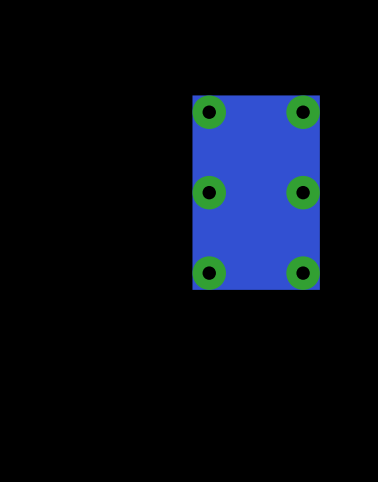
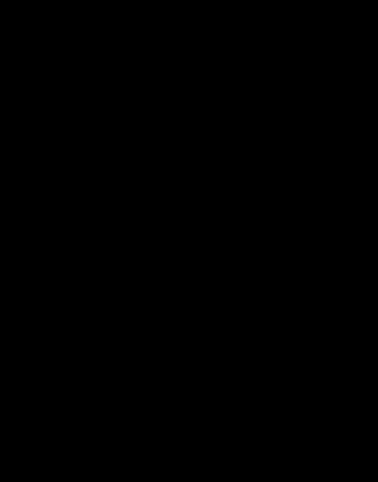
part: (256, 192) -> none

